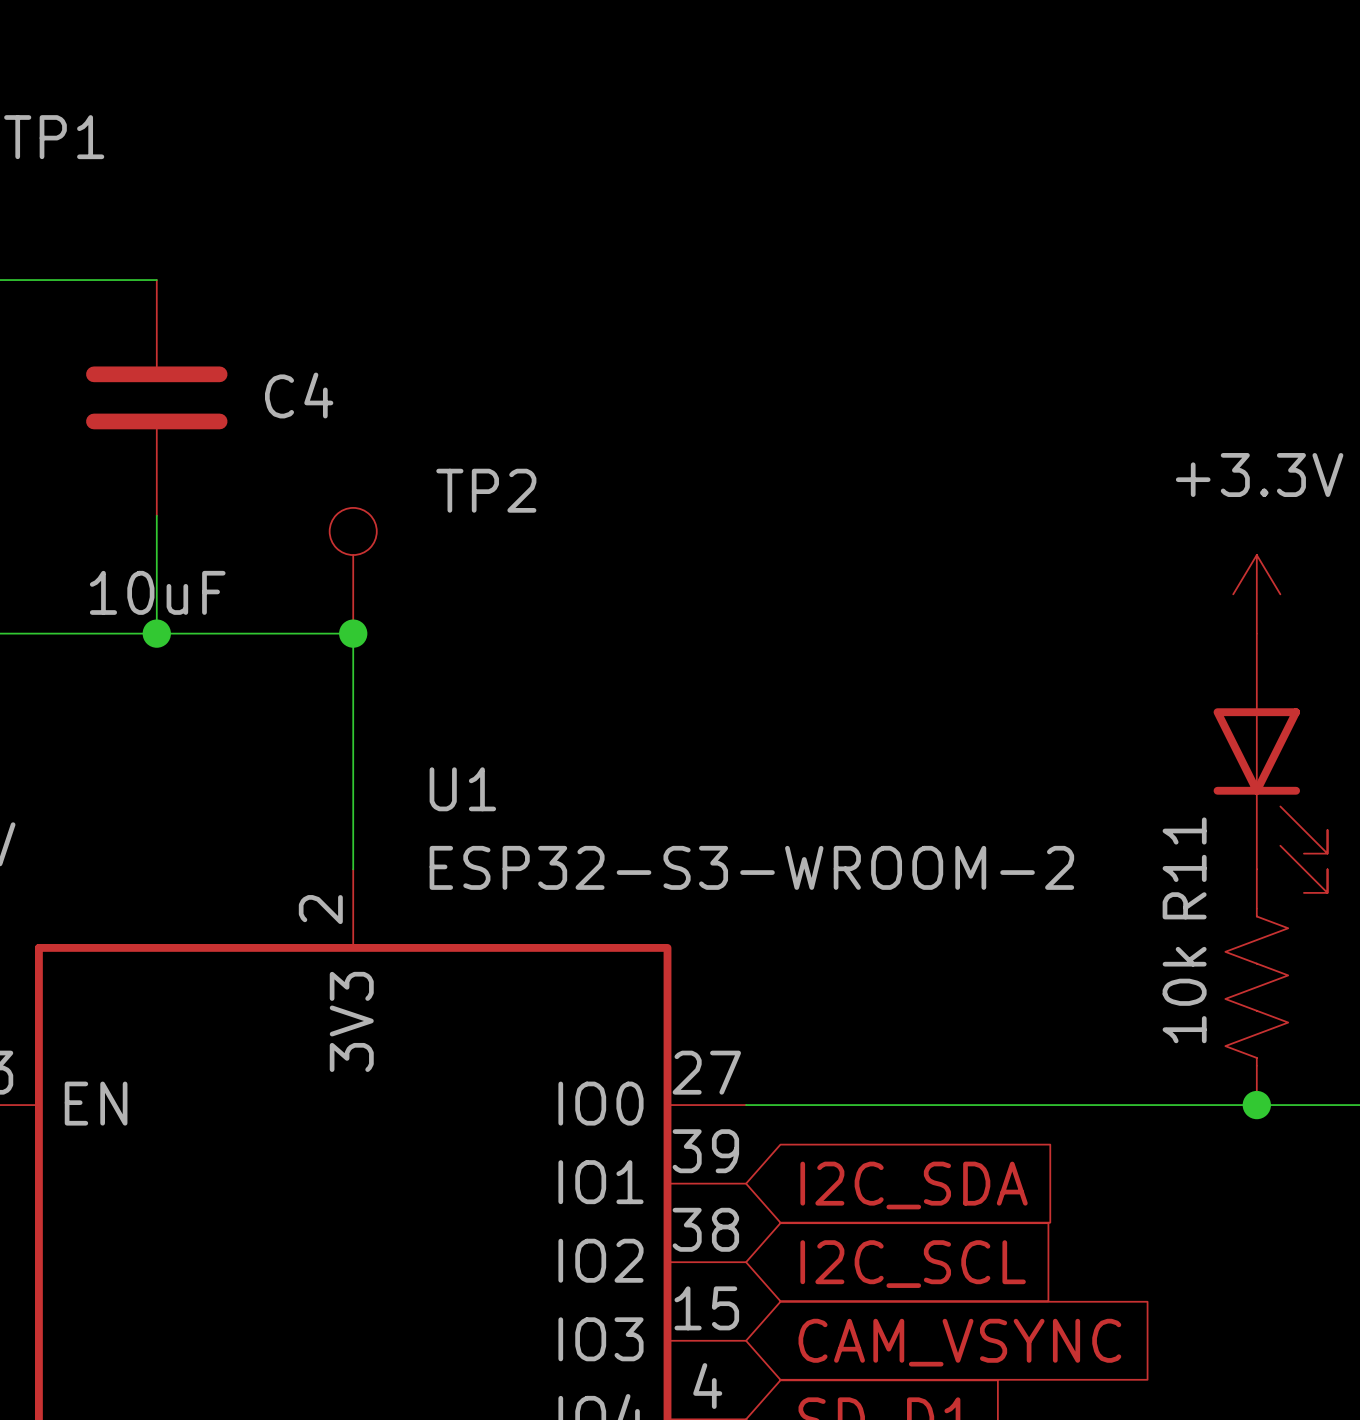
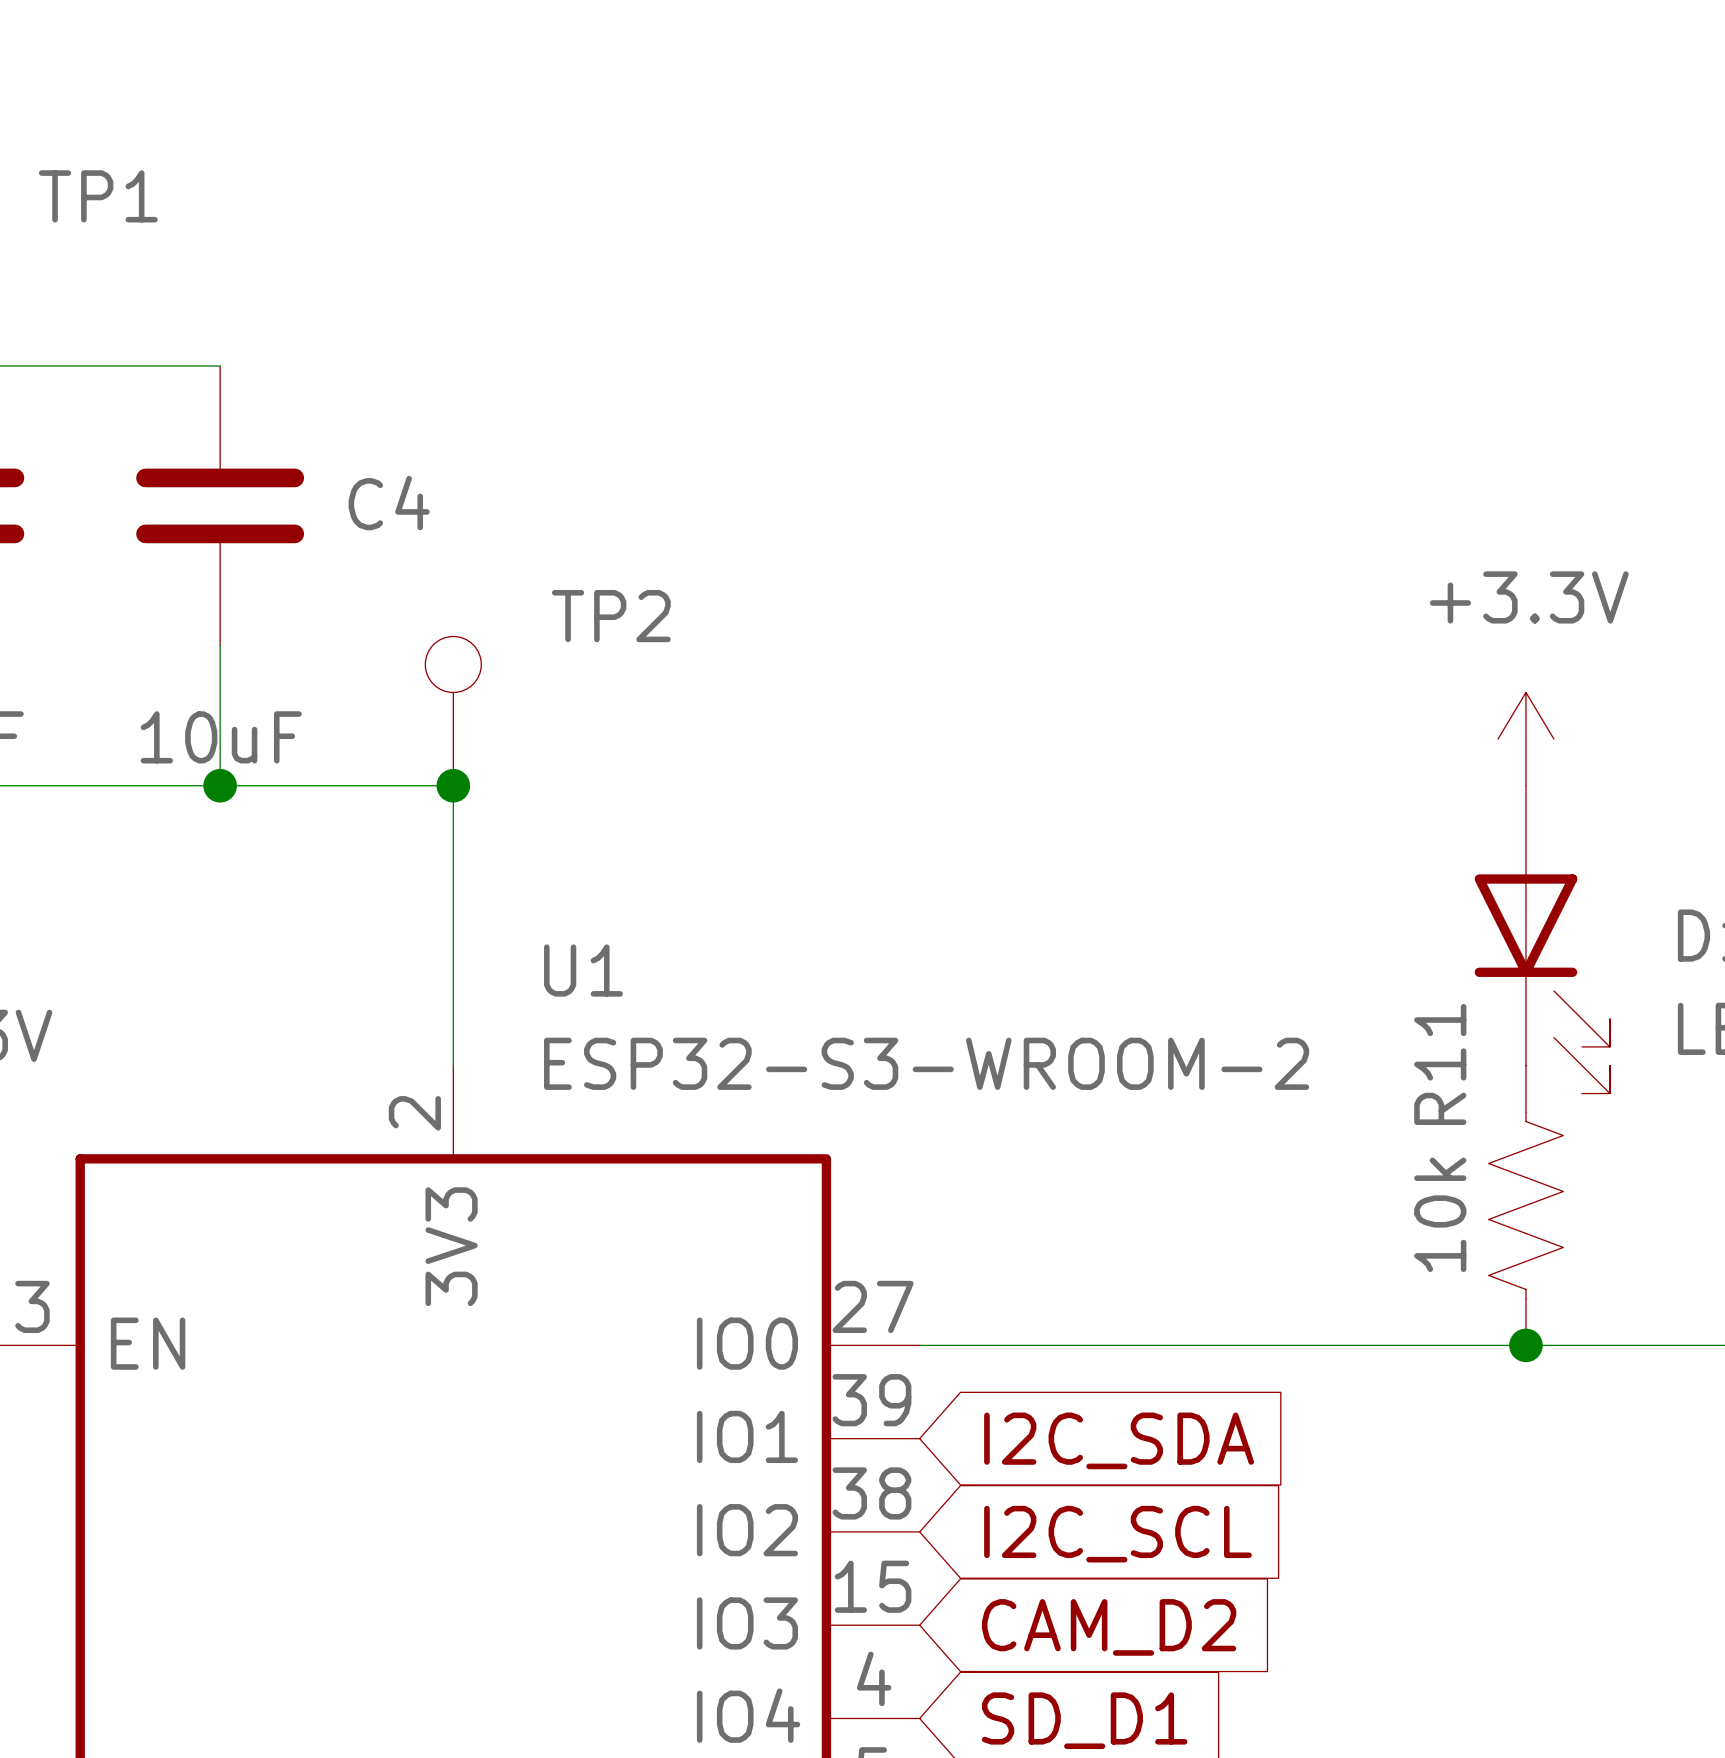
global label: CAM_VSYNC (959, 1342) -> CAM_D2 (1109, 1627)

